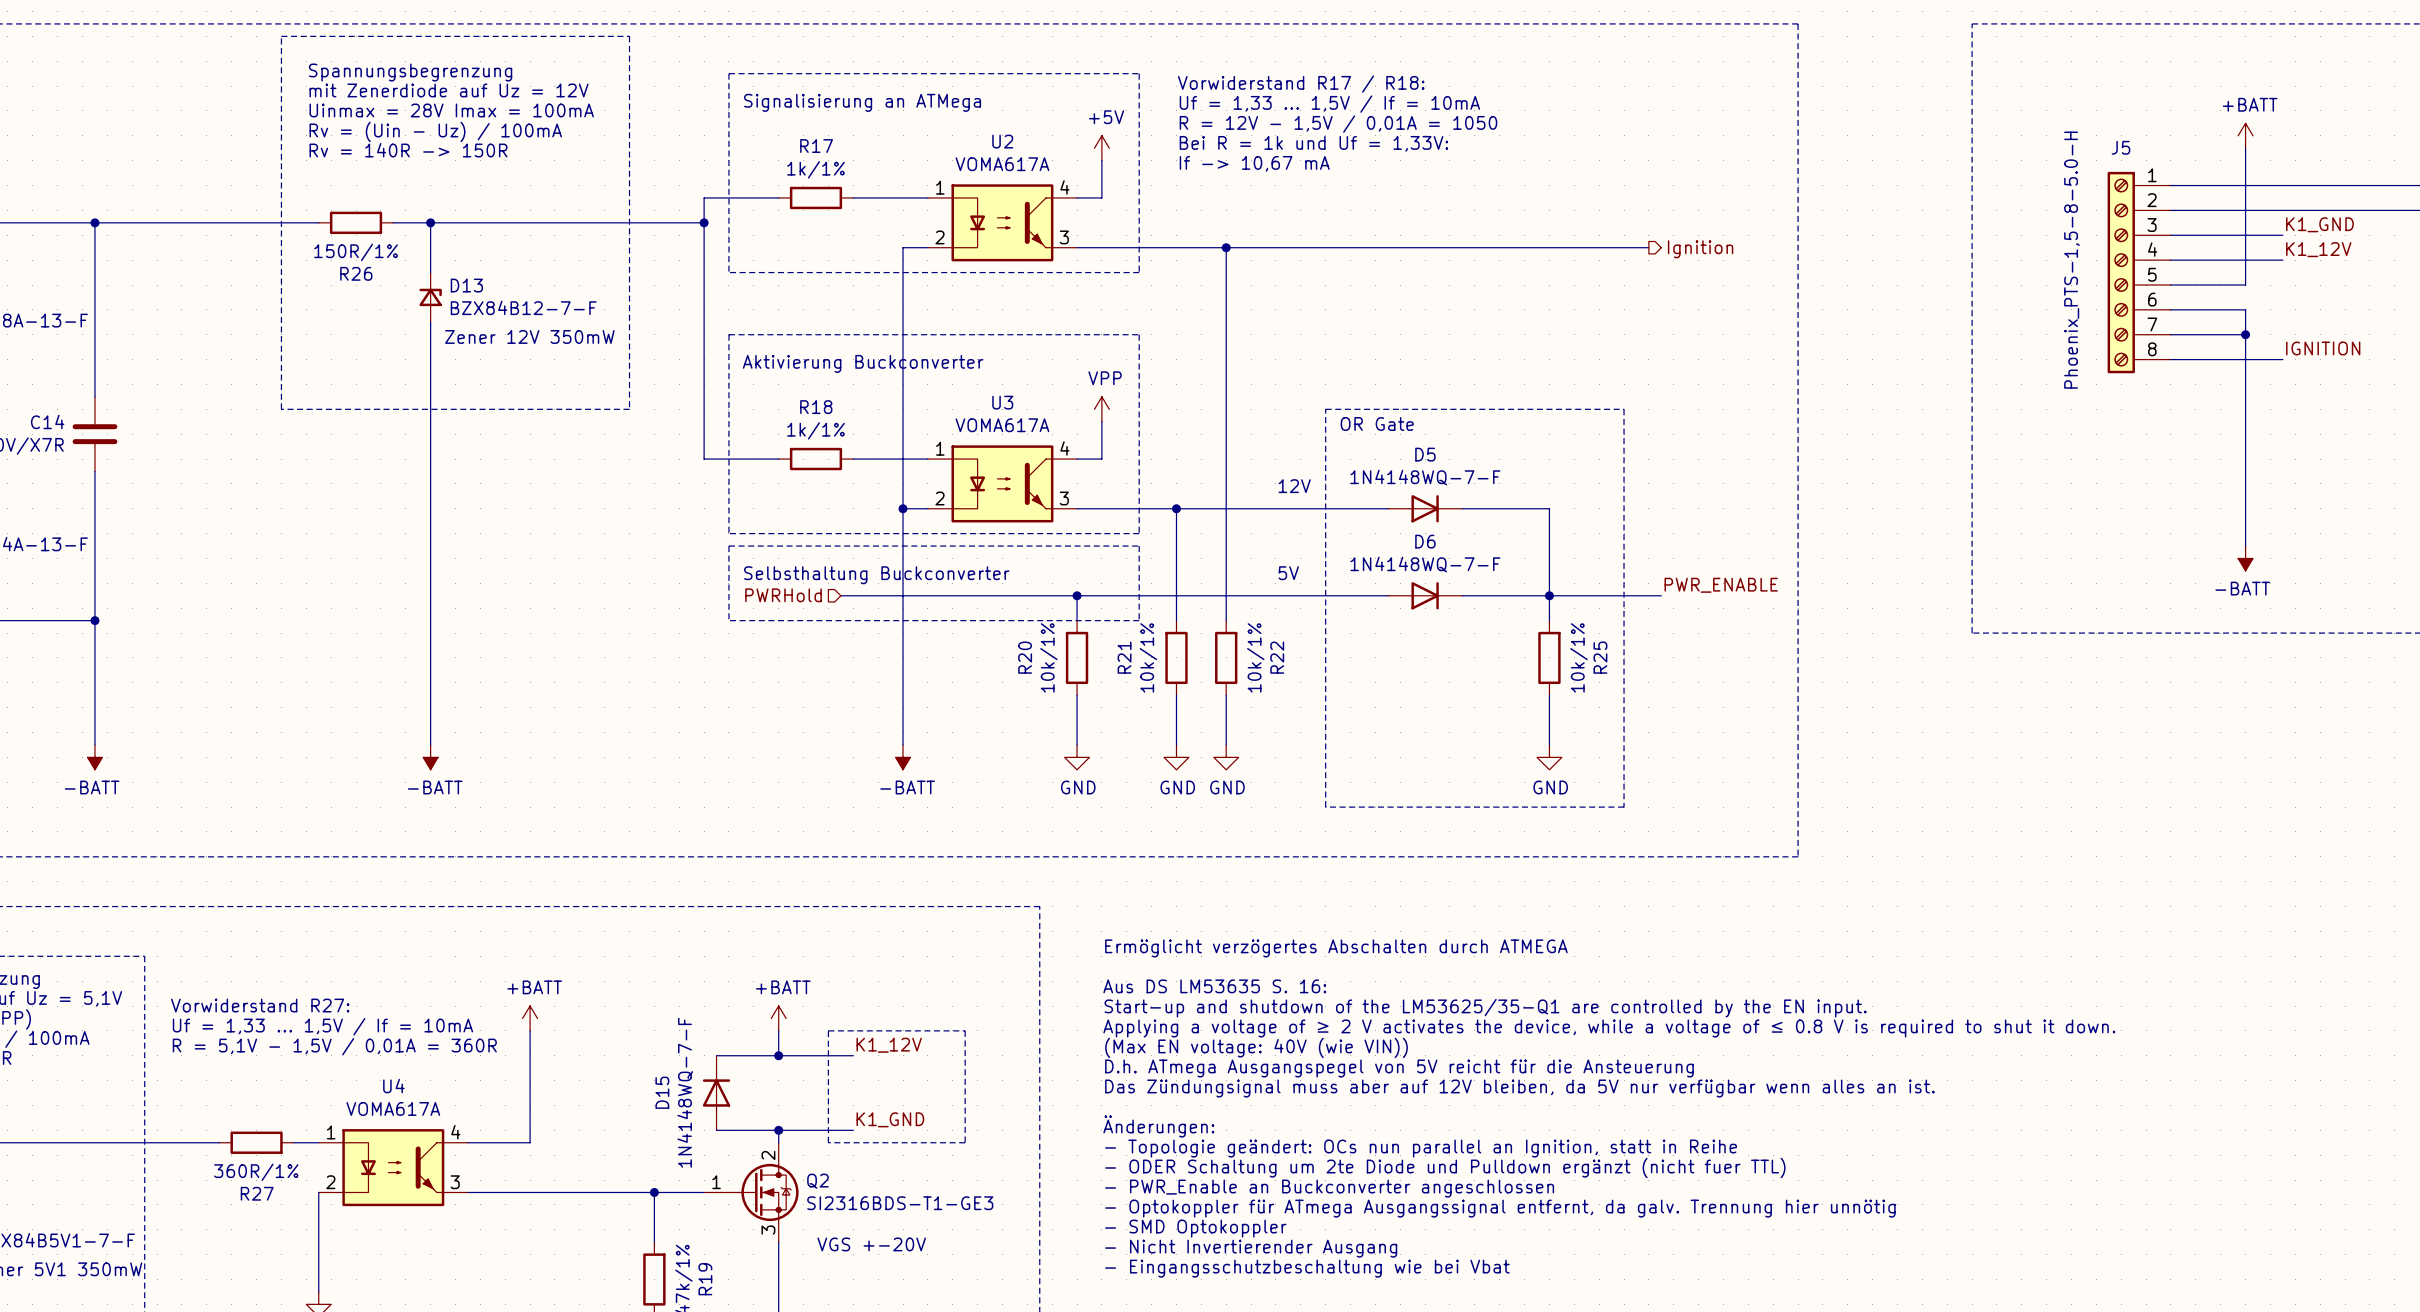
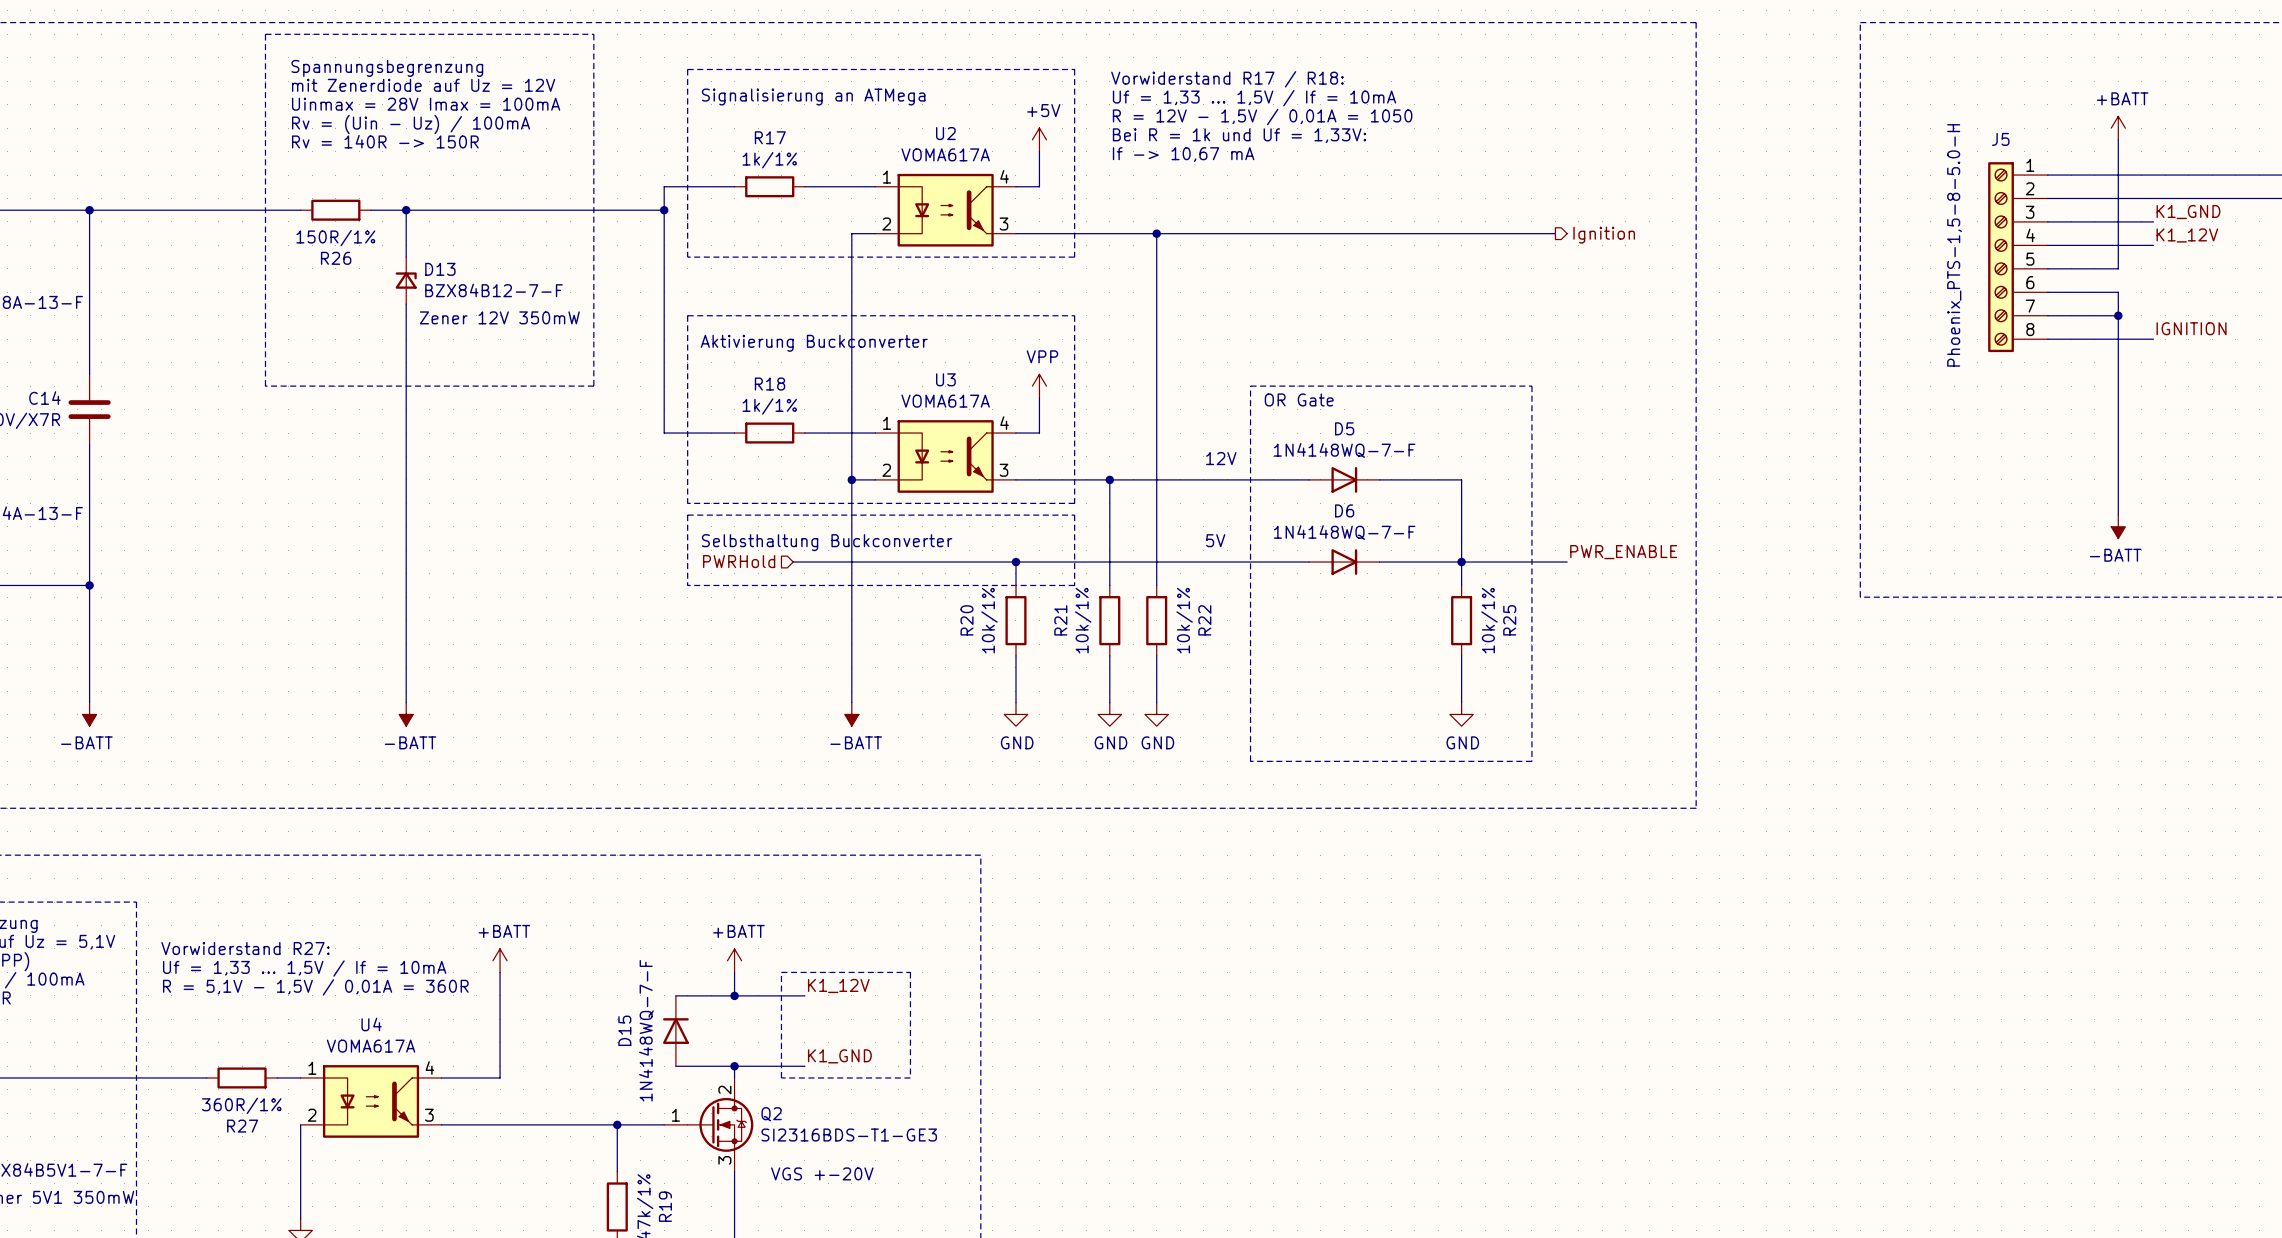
text: Ermöglicht verzögertes Abschalten durch ATMEGA (1336, 948) -> none
text: Aus DS LM53635 S. 16: (1214, 986) -> none
text: Start-up and shutdown of the LM53625/35-Q1 are controlled by the EN input. (1485, 1008) -> none
text: Applying a voltage of ≥ 2 V activates the device, while a voltage of ≤ 0.8 V is required to shut it down. (1609, 1028) -> none
text: (Max EN voltage: 40V (wie VIN)) (1256, 1047) -> none
text: D.h. ATmega Ausgangspegel von 5V reicht für die Ansteuerung (1399, 1068) -> none
text: Das Zündungsignal muss aber auf 12V bleiben, da 5V nur verfügbar wenn alles an ist. (1519, 1088) -> none
text: Änderungen: (1158, 1126) -> none
text: - Topologie geändert: OCs nun parallel an Ignition, statt in Reihe (1421, 1148) -> none
text: - ODER Schaltung um 2te Diode und Pulldown ergänzt (nicht fuer TTL) (1445, 1167) -> none
text: - PWR_Enable an Buckconverter angeschlossen (1329, 1188) -> none
text: - Optokoppler für ATmega Ausgangssignal entfernt, da galv. Trennung hier unnötig (1500, 1208) -> none
text: - SMD Optokoppler (1195, 1228) -> none
text: - Nicht Invertierender Ausgang (1251, 1248) -> none
text: - Eingangsschutzbeschaltung wie bei Vbat (1307, 1268) -> none

